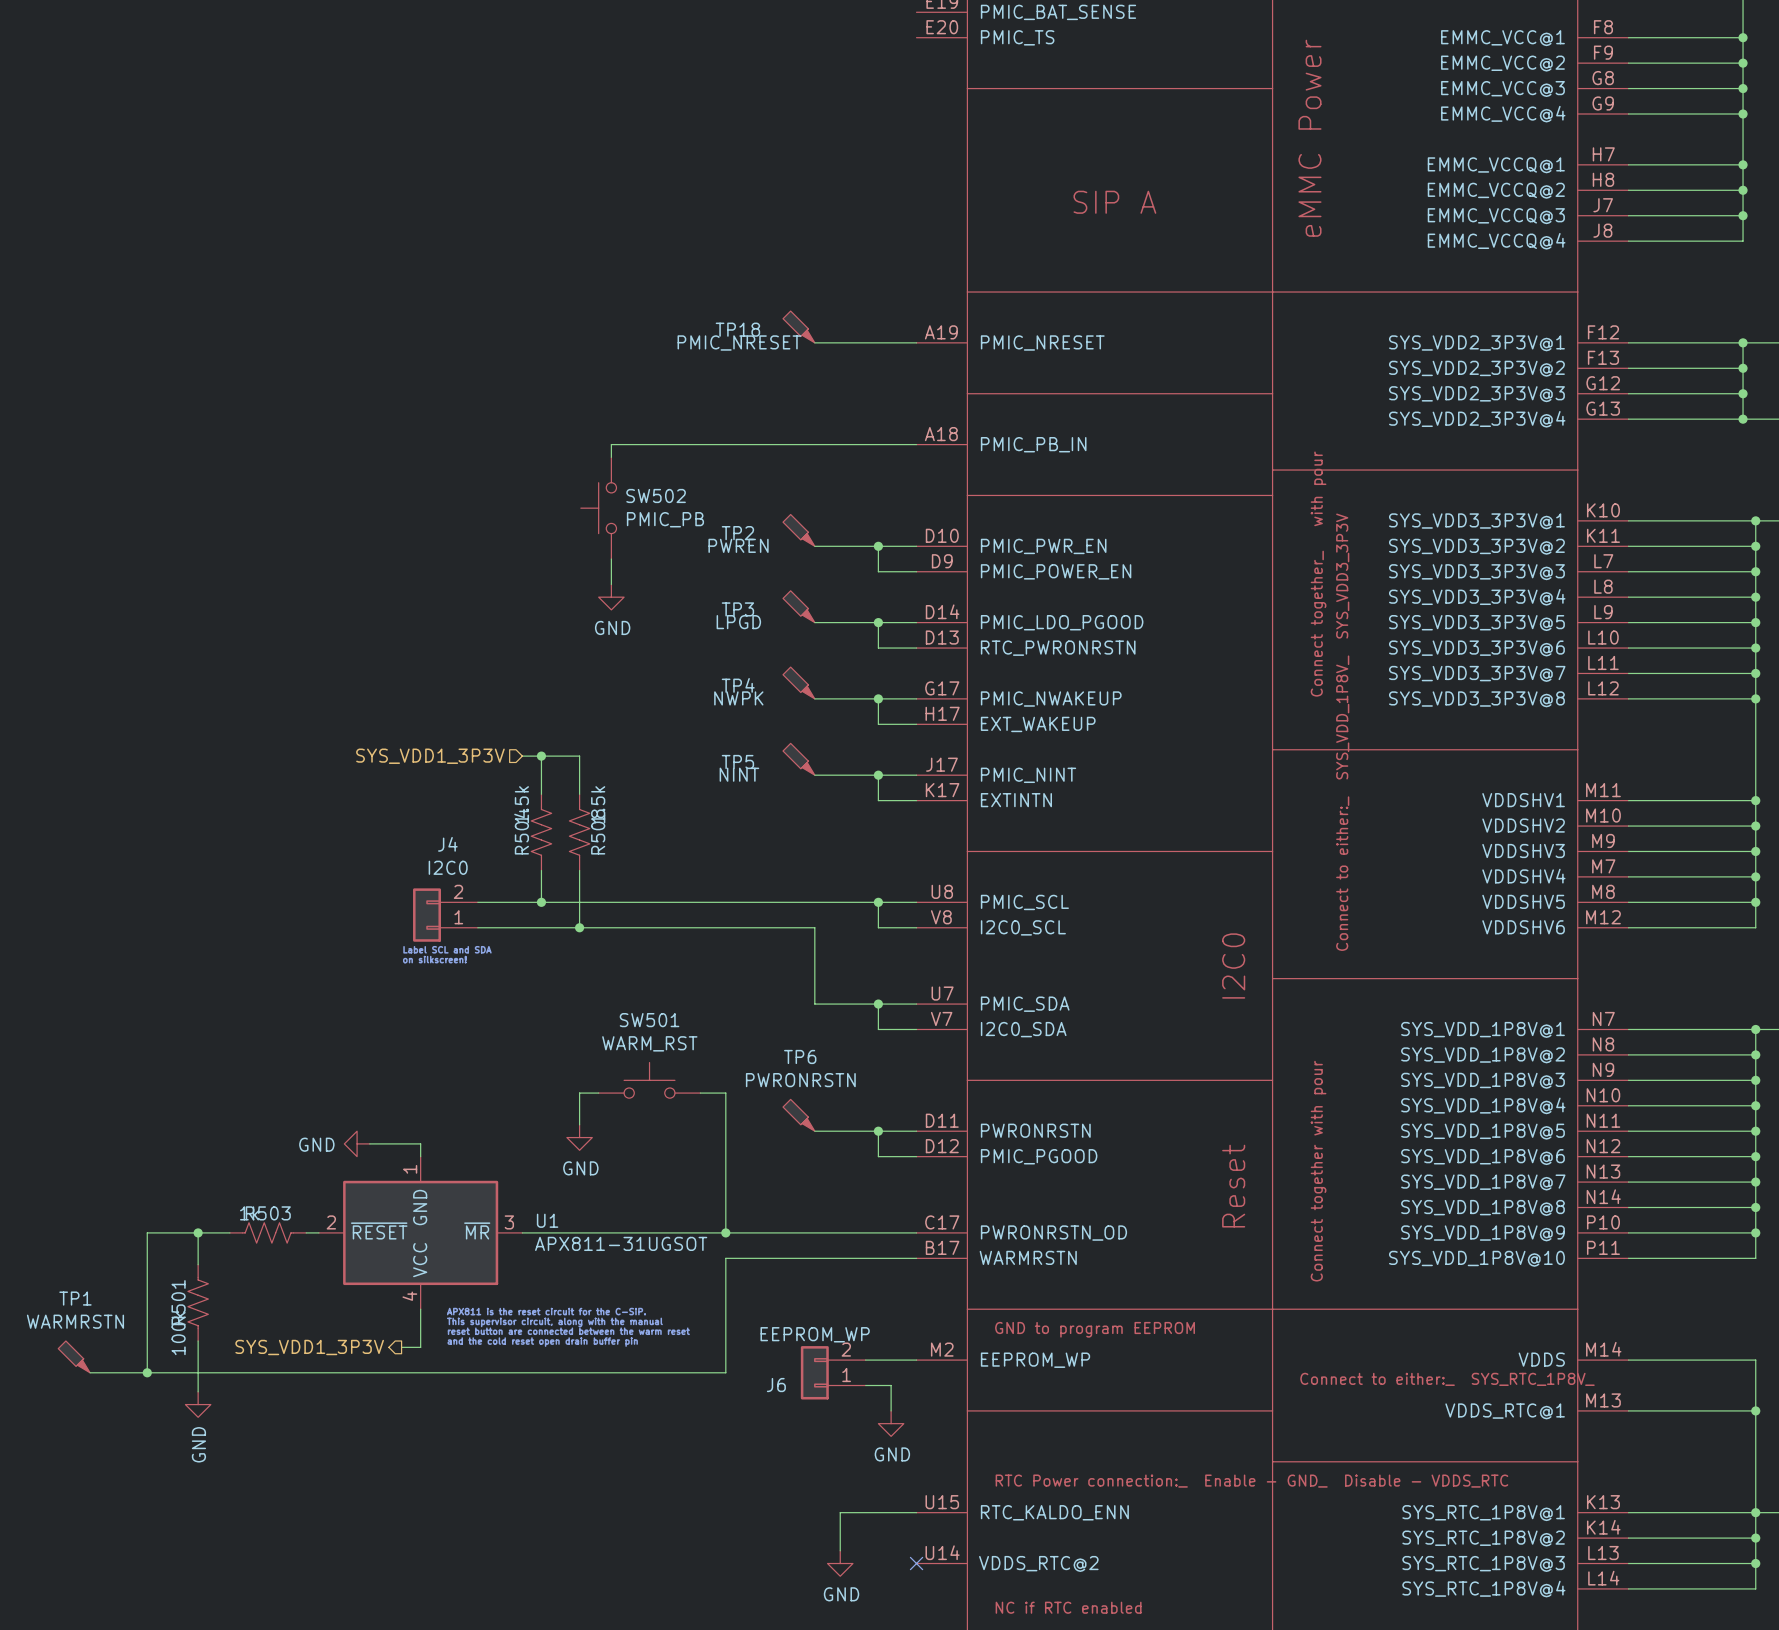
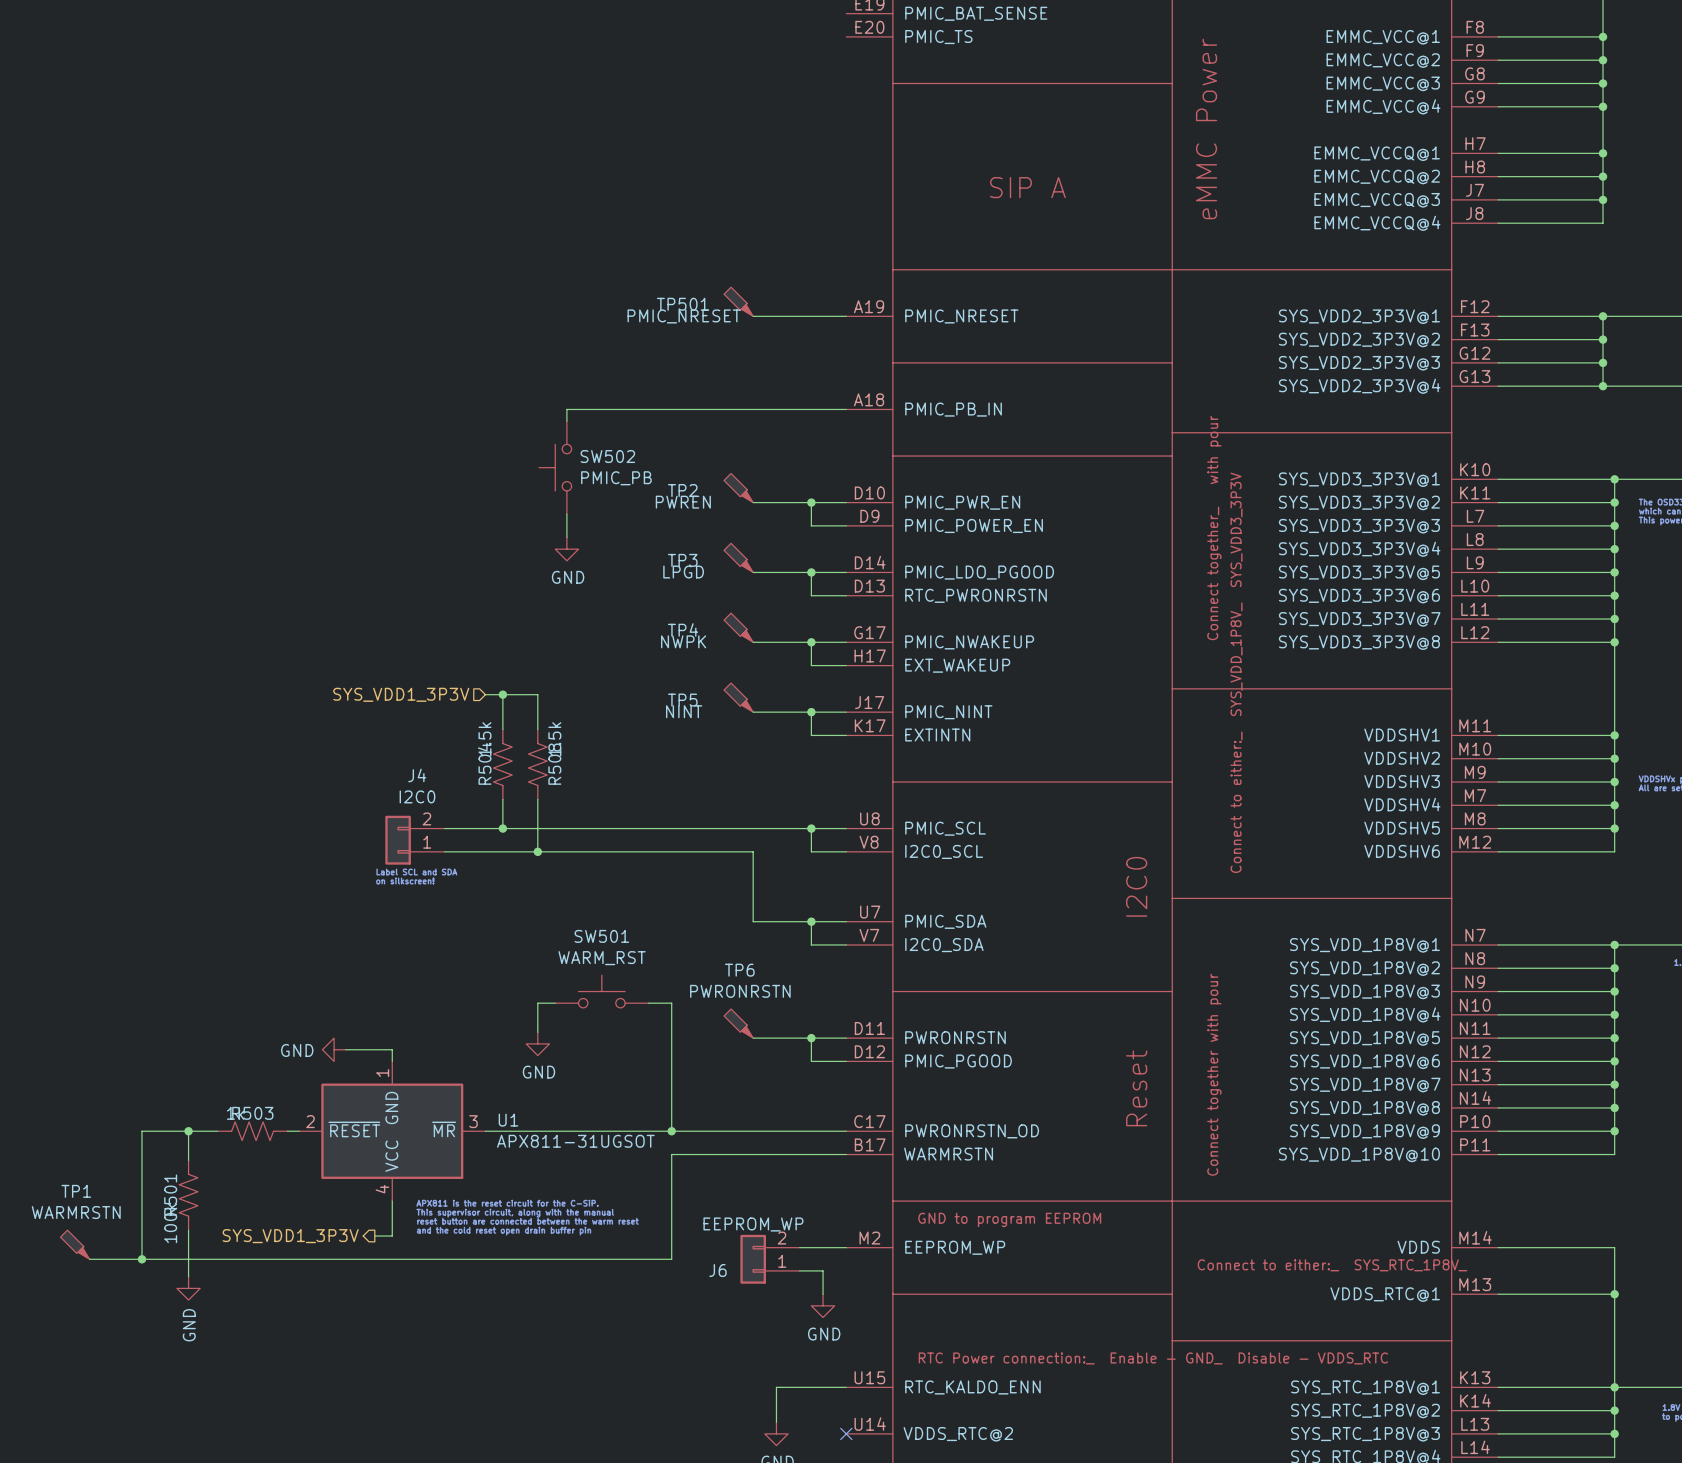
TP18 name: TP18 (737, 329) -> TP501 (682, 304)

